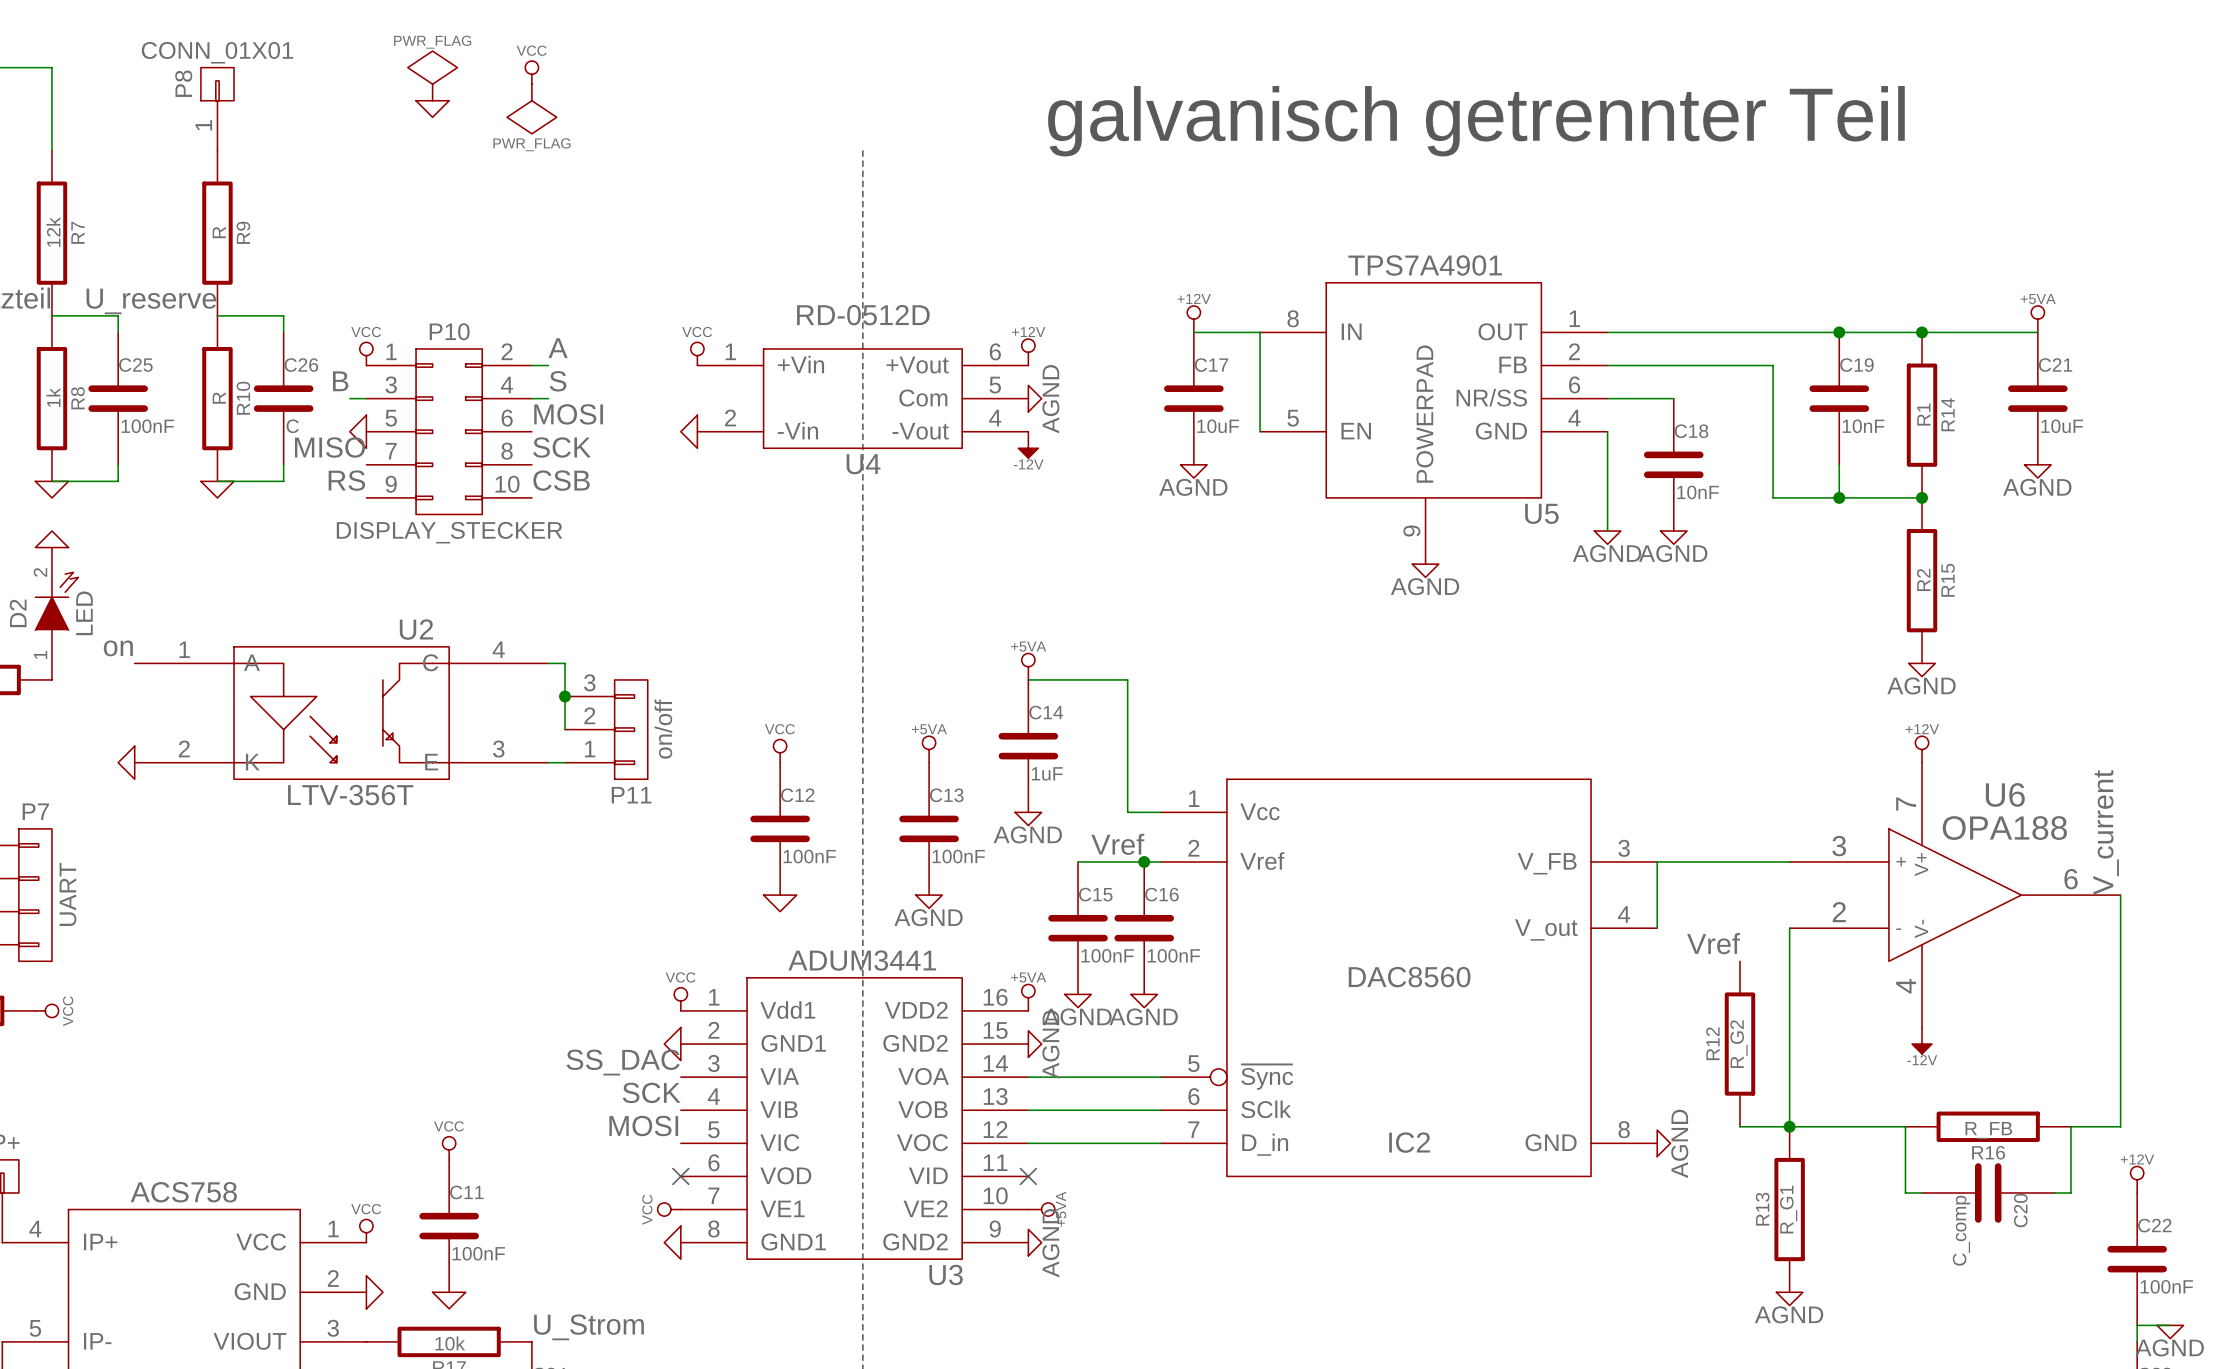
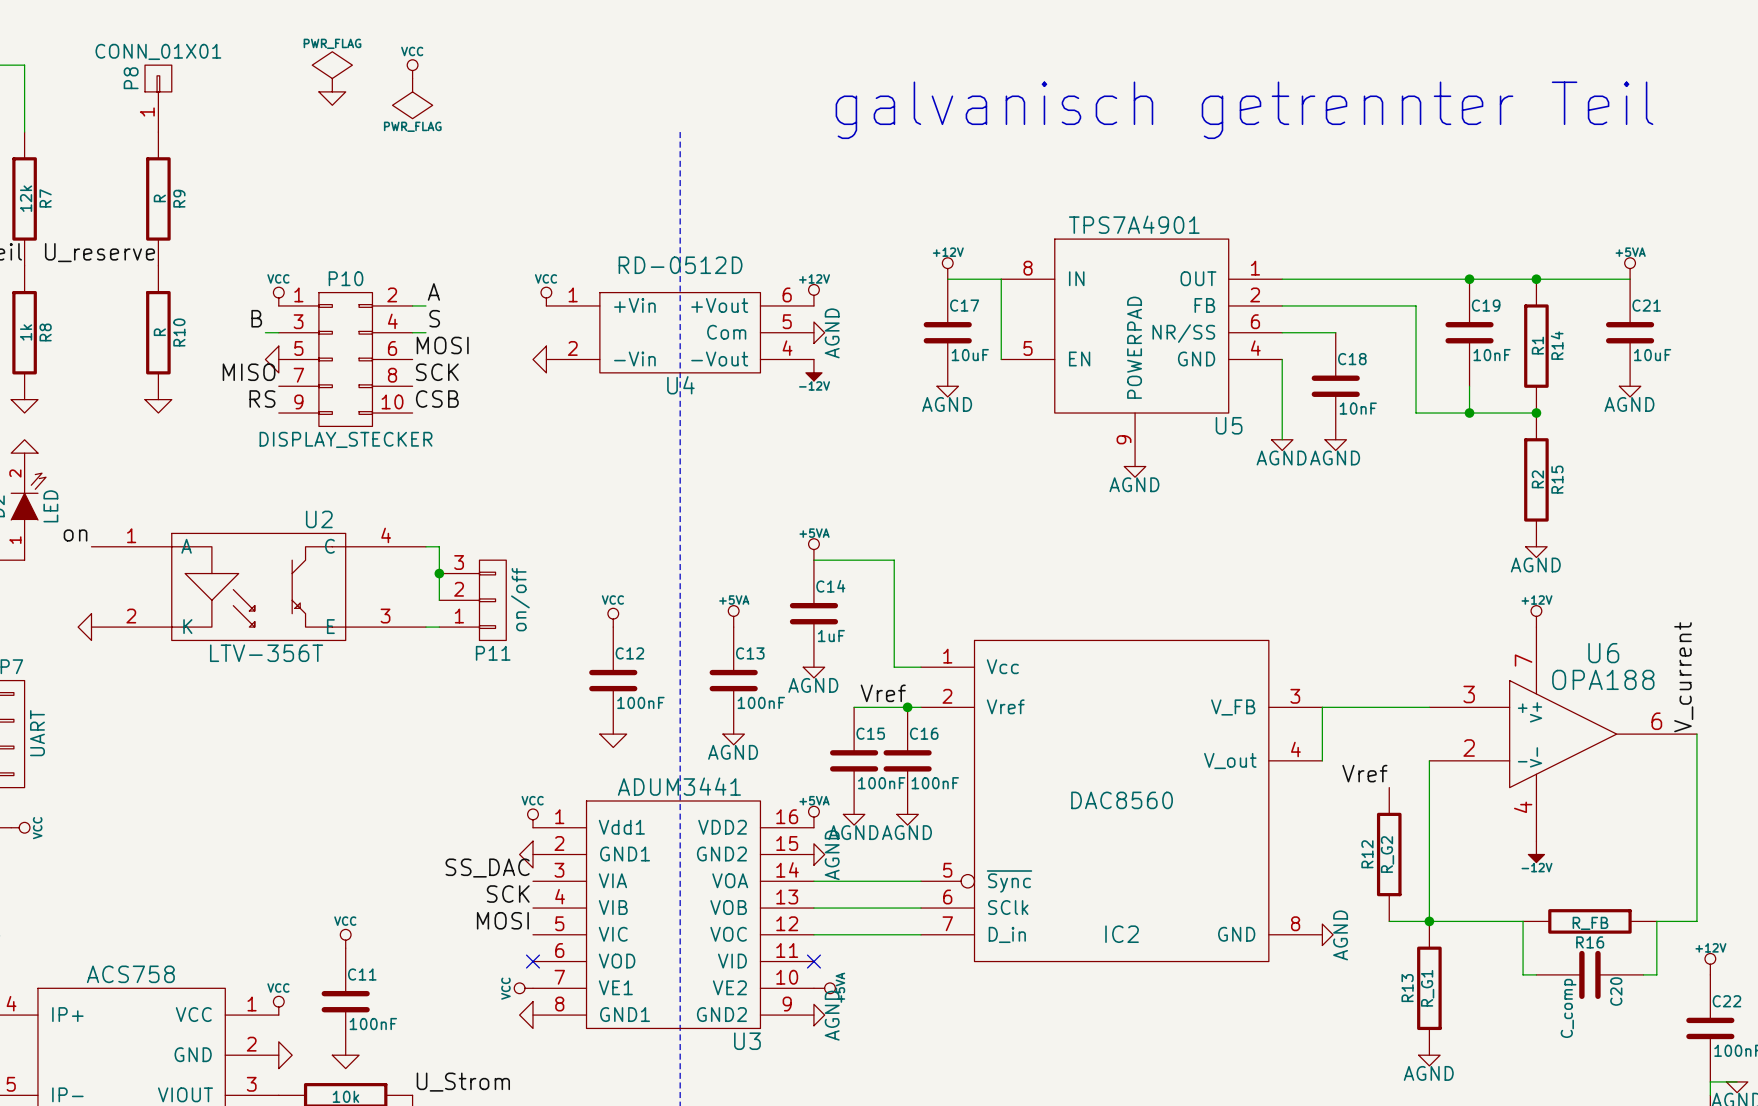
wire: (51, 315) (118, 315) (118, 332) -> none
wire: (217, 315) (283, 315) (283, 332) -> none
C25: 100nF (118, 398) -> none
C26: C (283, 398) -> none
wire: (118, 464) (118, 481) (51, 481) -> none
wire: (283, 464) (283, 481) (217, 481) -> none

